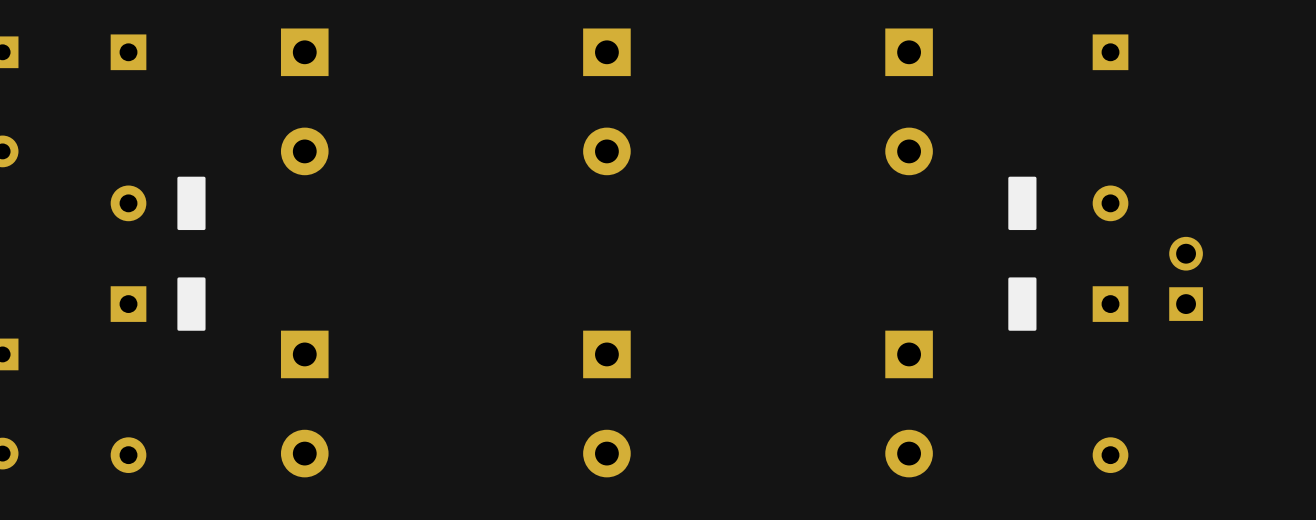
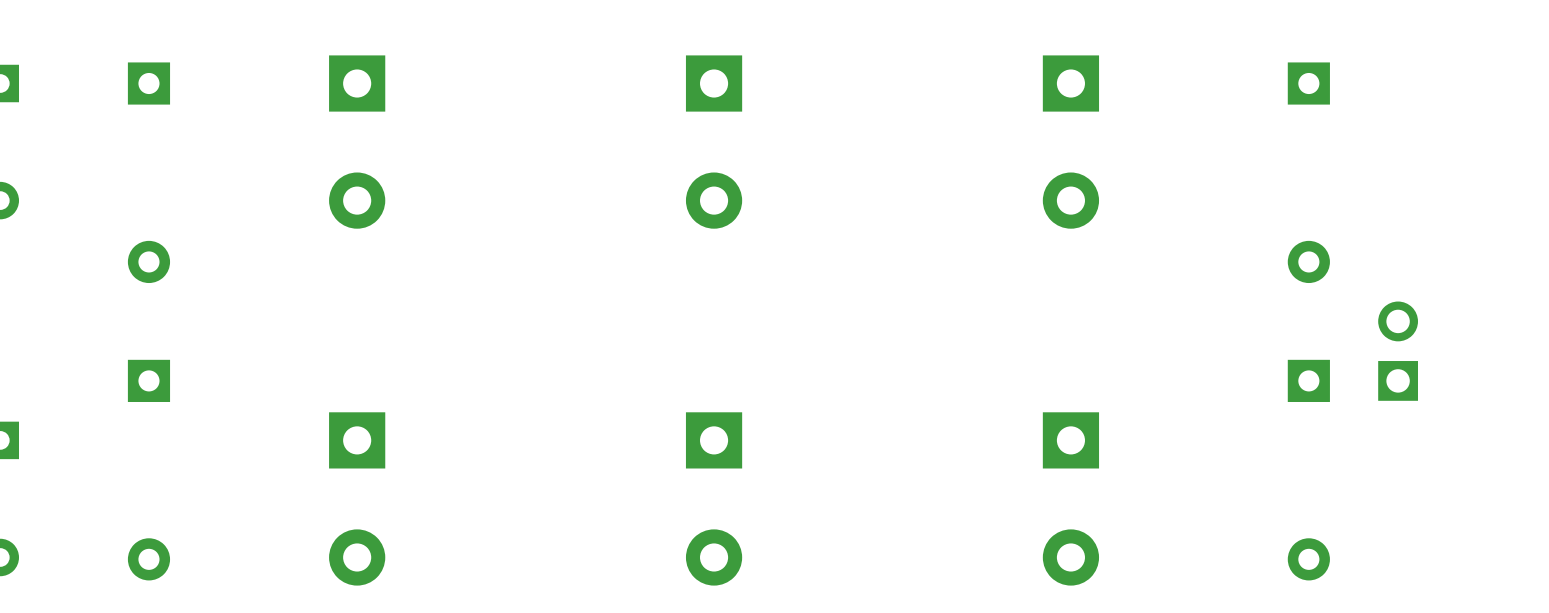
drawing: [177, 176, 206, 231] -> none
drawing: [1008, 176, 1037, 231] -> none
drawing: [177, 277, 206, 331] -> none
drawing: [1008, 277, 1037, 331] -> none

